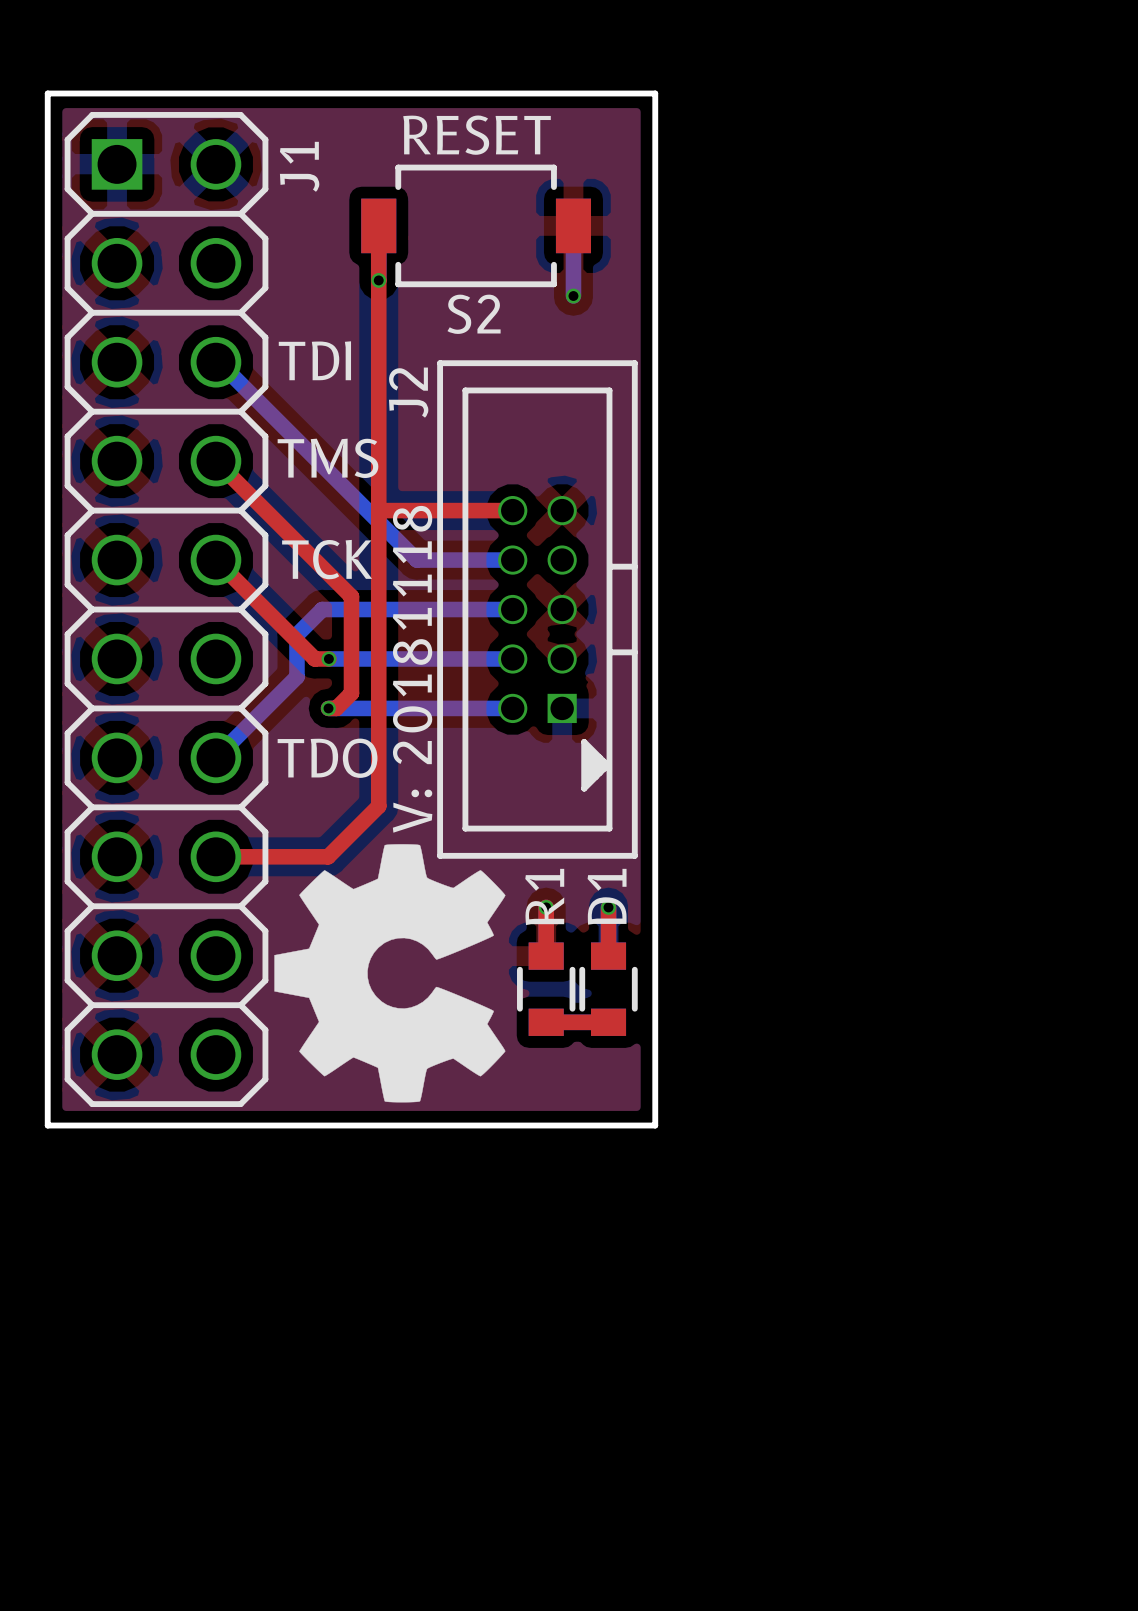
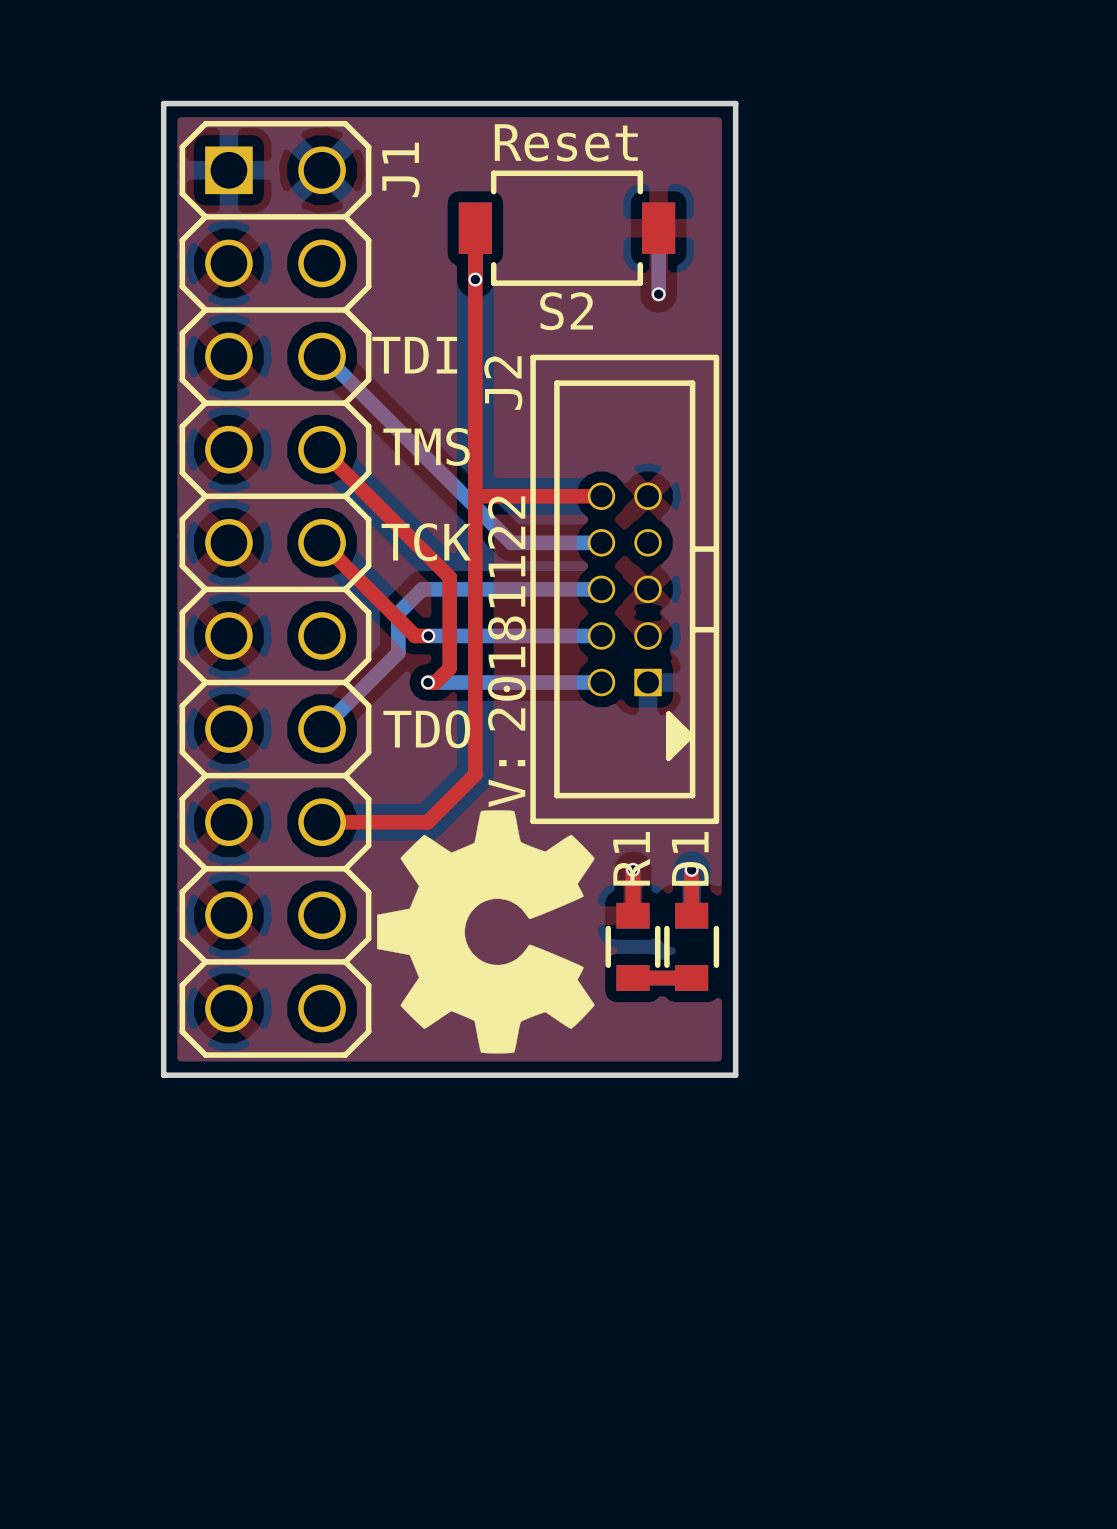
S2 value: RESET (477, 135) -> none
text: none -> Reset (566, 142)
drawing shape: [392, 505, 433, 833] -> [487, 496, 527, 808]

